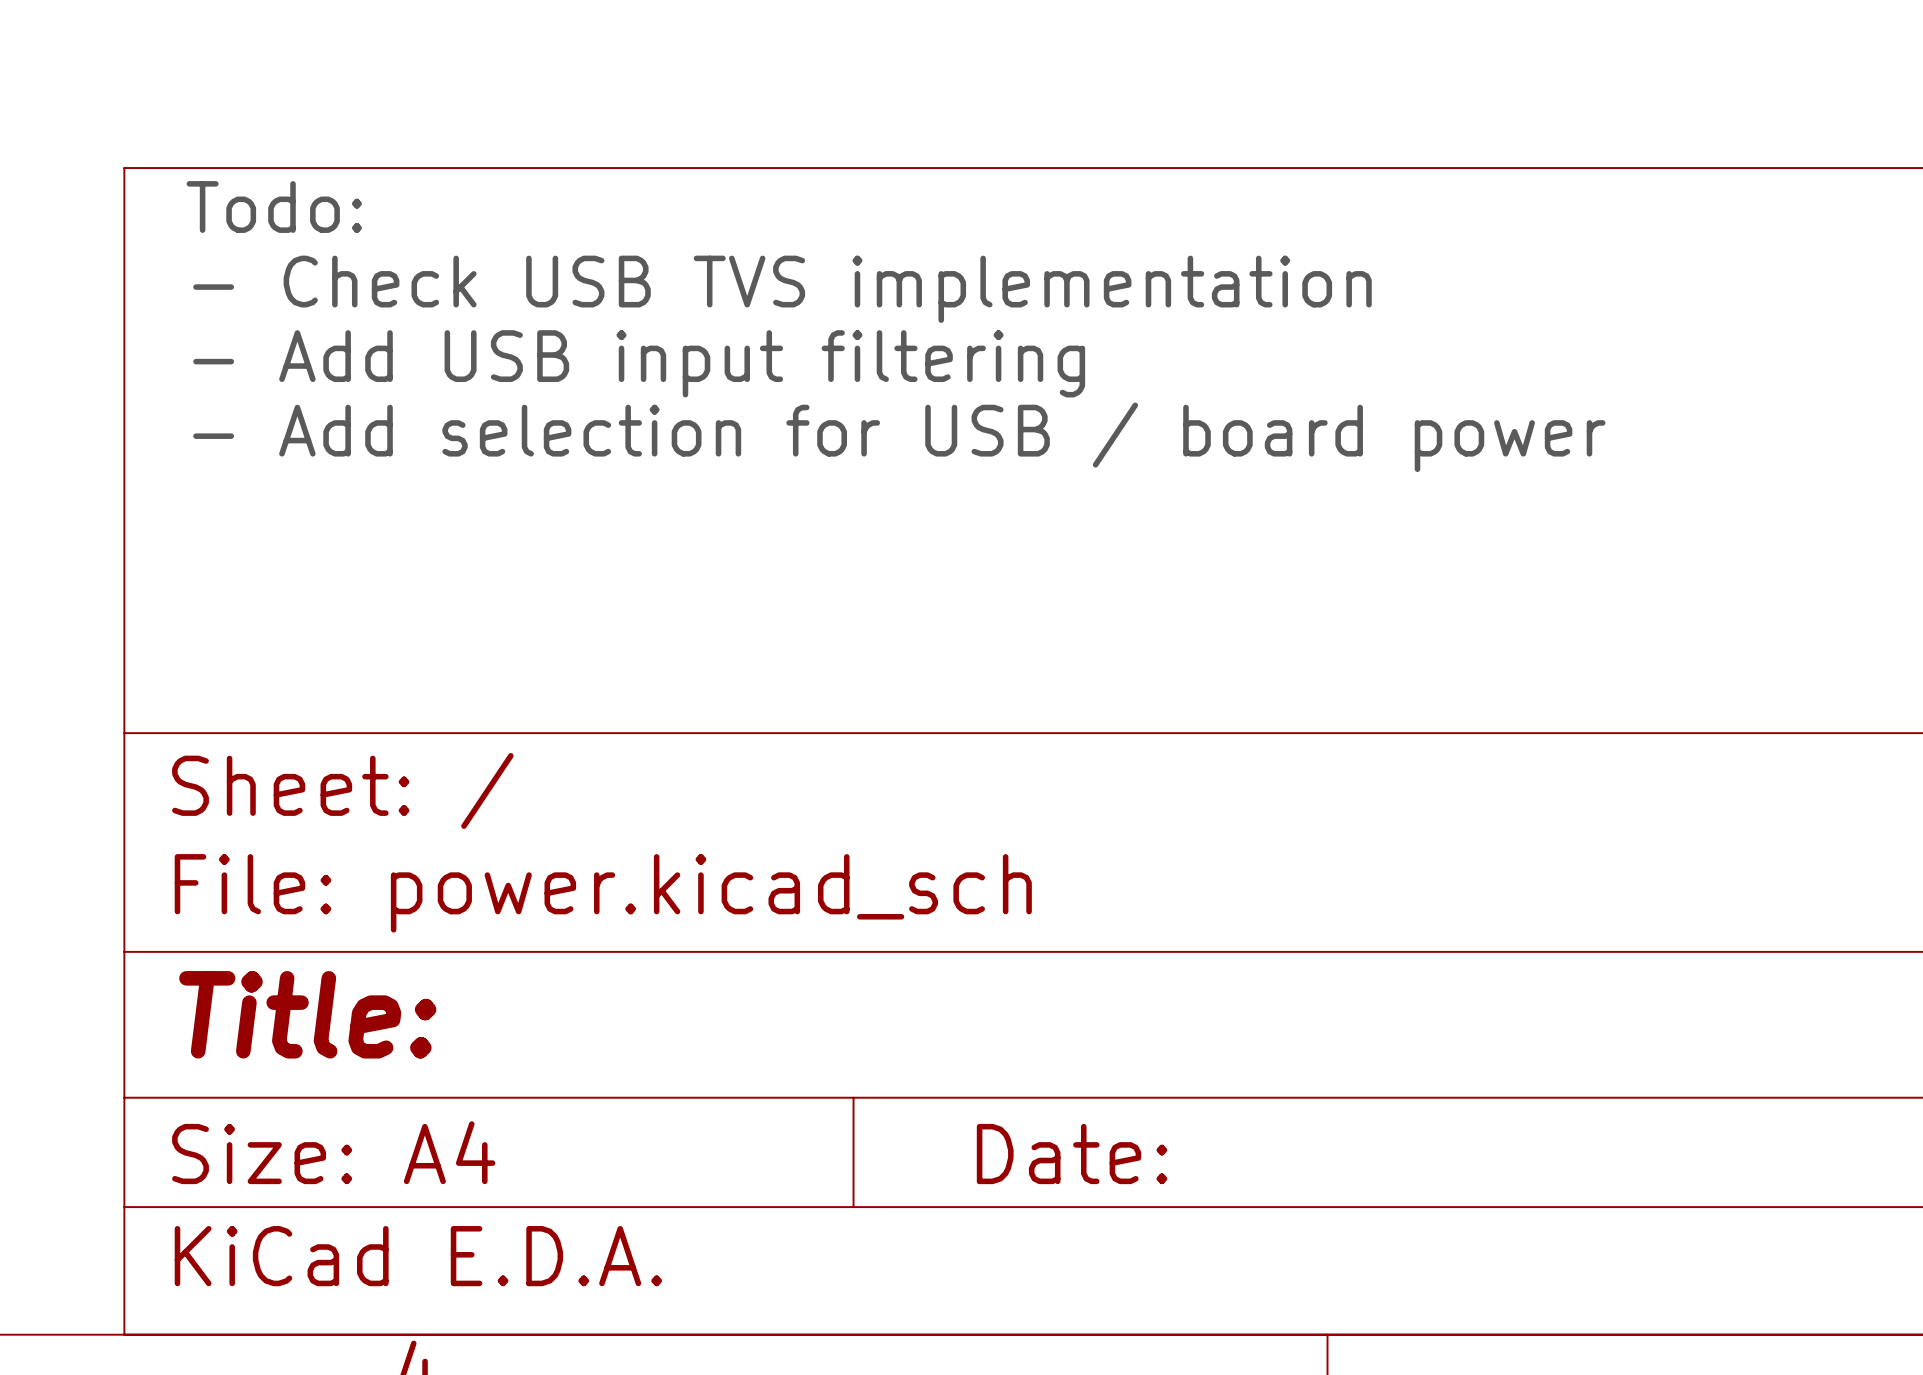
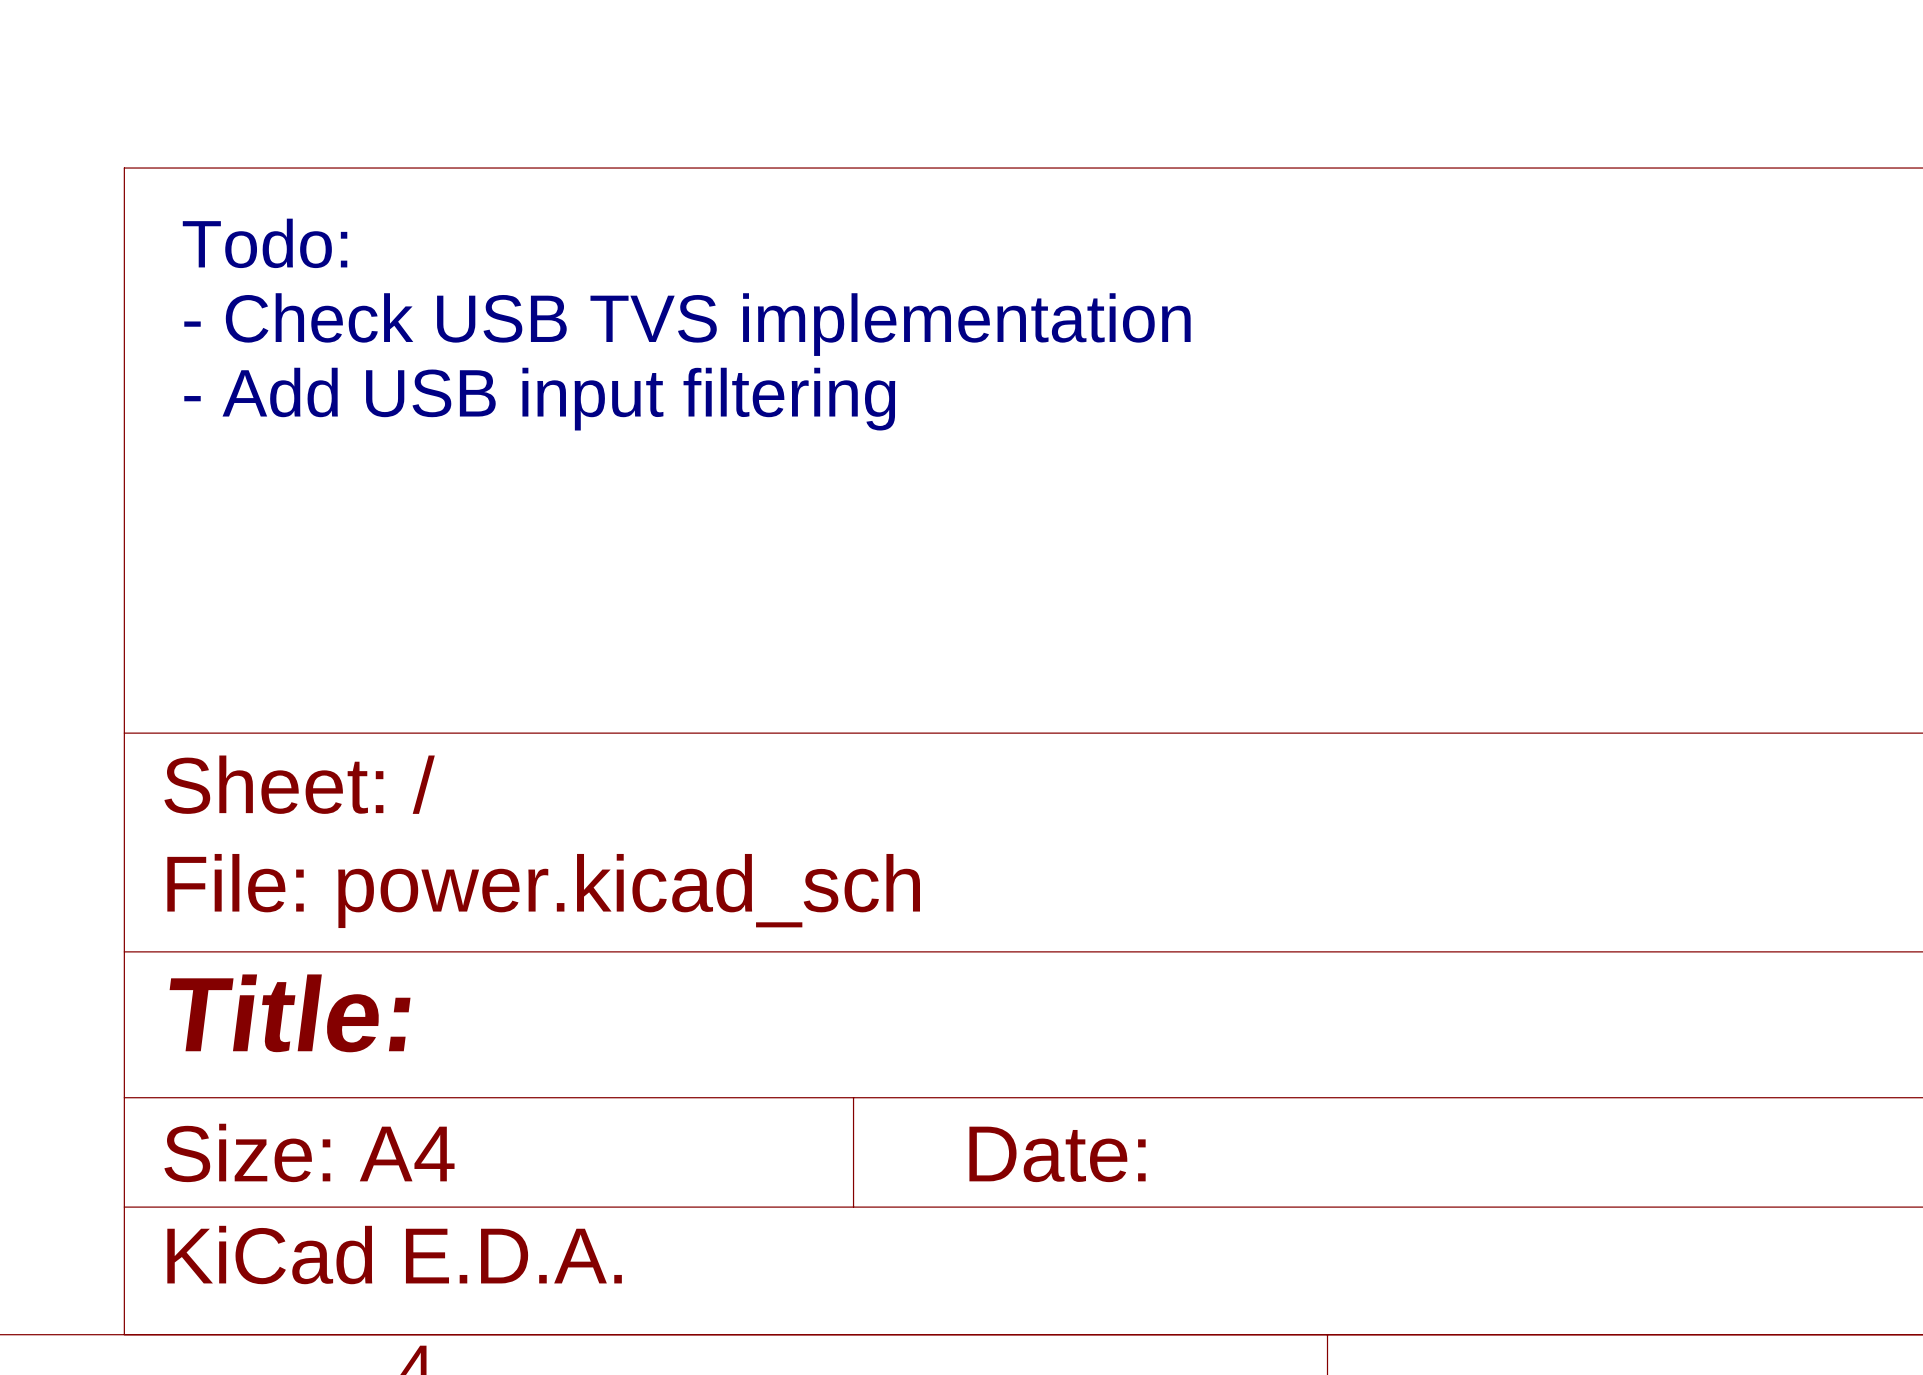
text position: Todo: (274, 207) -> Todo: (265, 243)
text position: - Check USB TVS implementation (782, 289) -> - Check USB TVS implementation (687, 324)
text position: - Add USB input filtering (639, 363) -> - Add USB input filtering (539, 399)
text: - Add selection for USB / board power (899, 437) -> none

